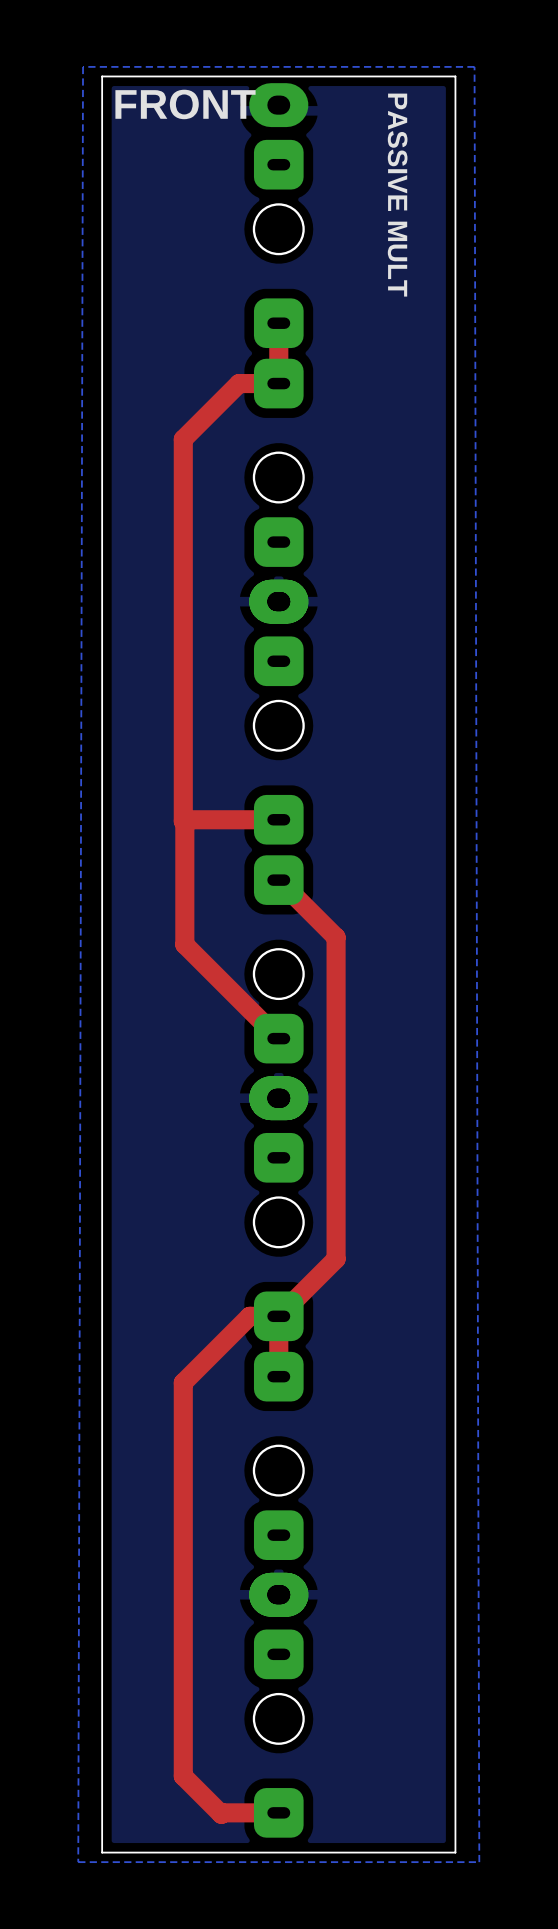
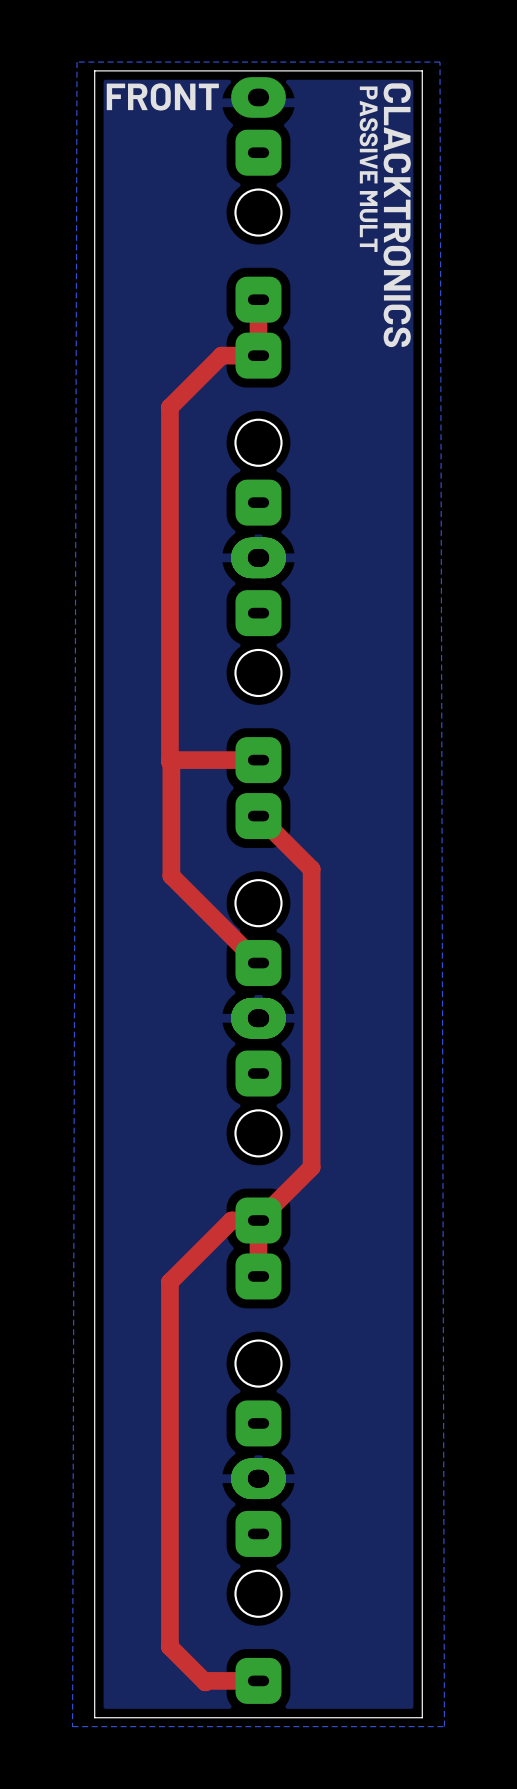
text: none -> CLACKTRONICS (397, 215)

